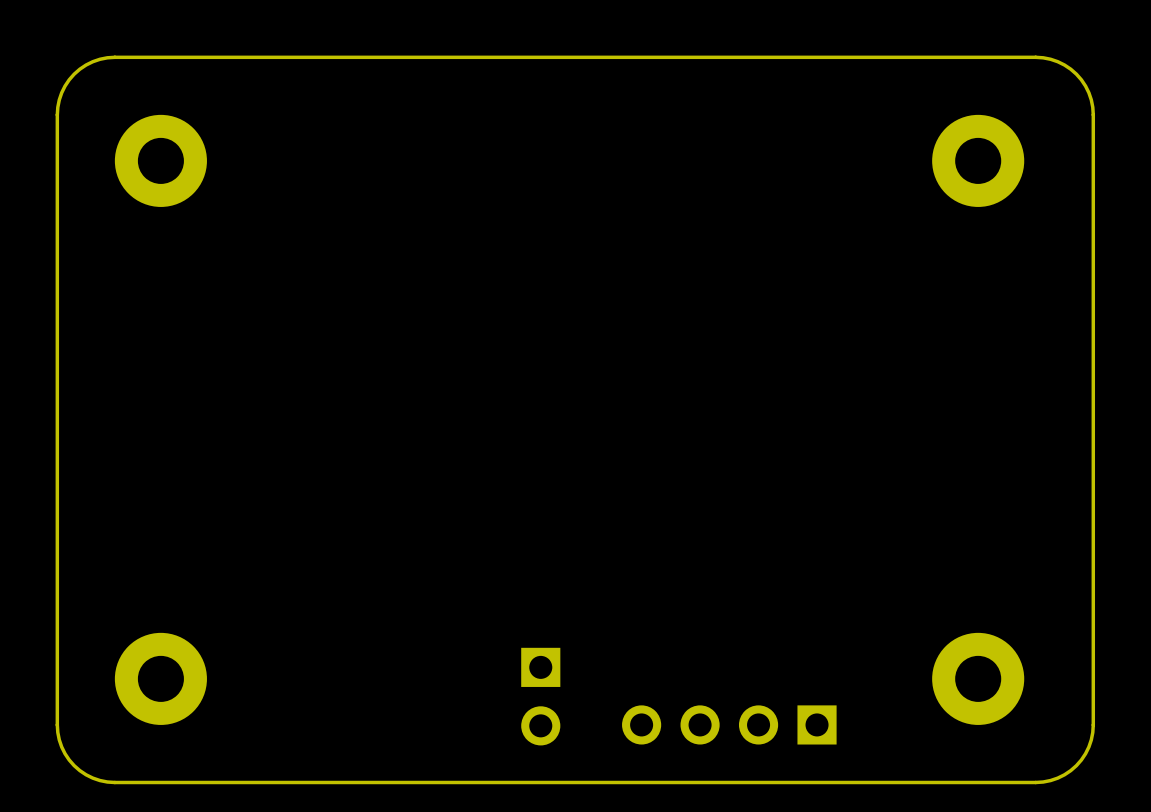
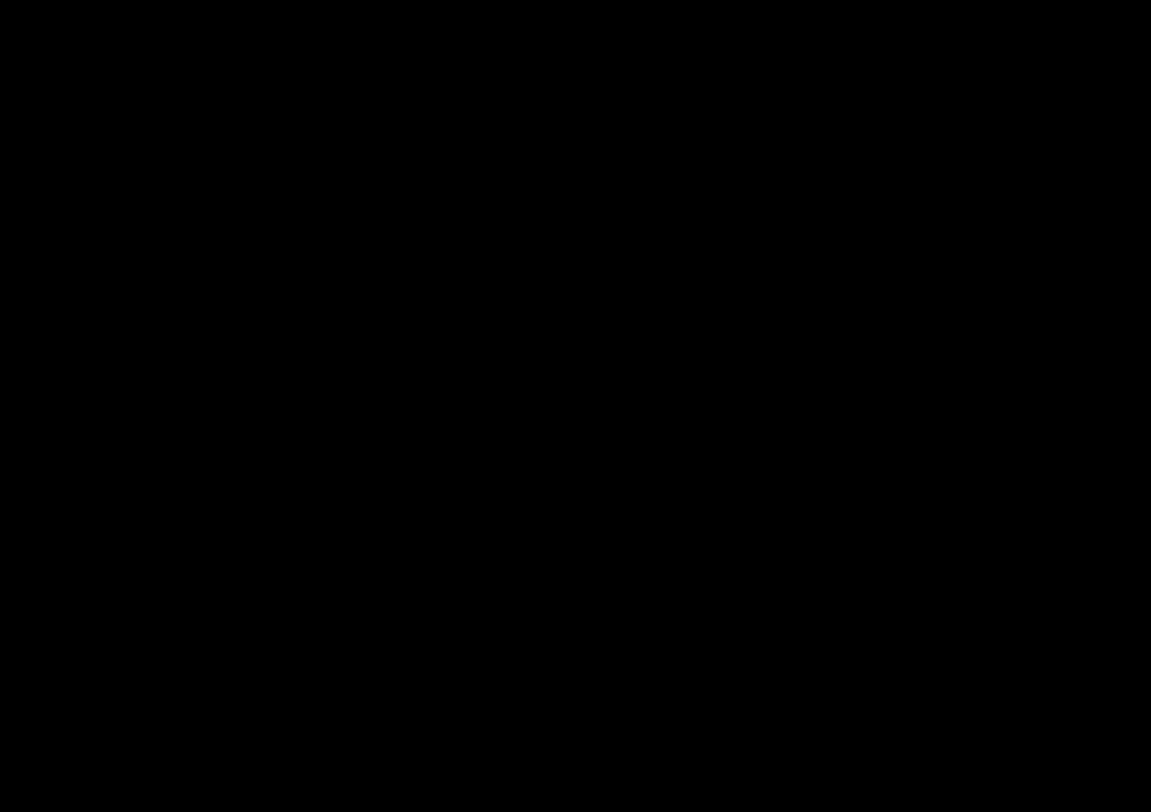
board edge: (1035, 57) (114, 57) (92, 61) (79, 69) (65, 86) (59, 99) (57, 114) (57, 724) (59, 739) (69, 759) (79, 770) (92, 778) (114, 782) (1035, 782) (1057, 778) (1070, 770) (1085, 753) (1091, 739) (1093, 724) (1093, 114) (1088, 92) (1076, 74) (1057, 61) (1035, 57) -> none
part: (160, 160) -> none
part: (978, 160) -> none
part: (160, 678) -> none
part: (978, 678) -> none
part: (540, 696) -> none
part: (729, 724) -> none

